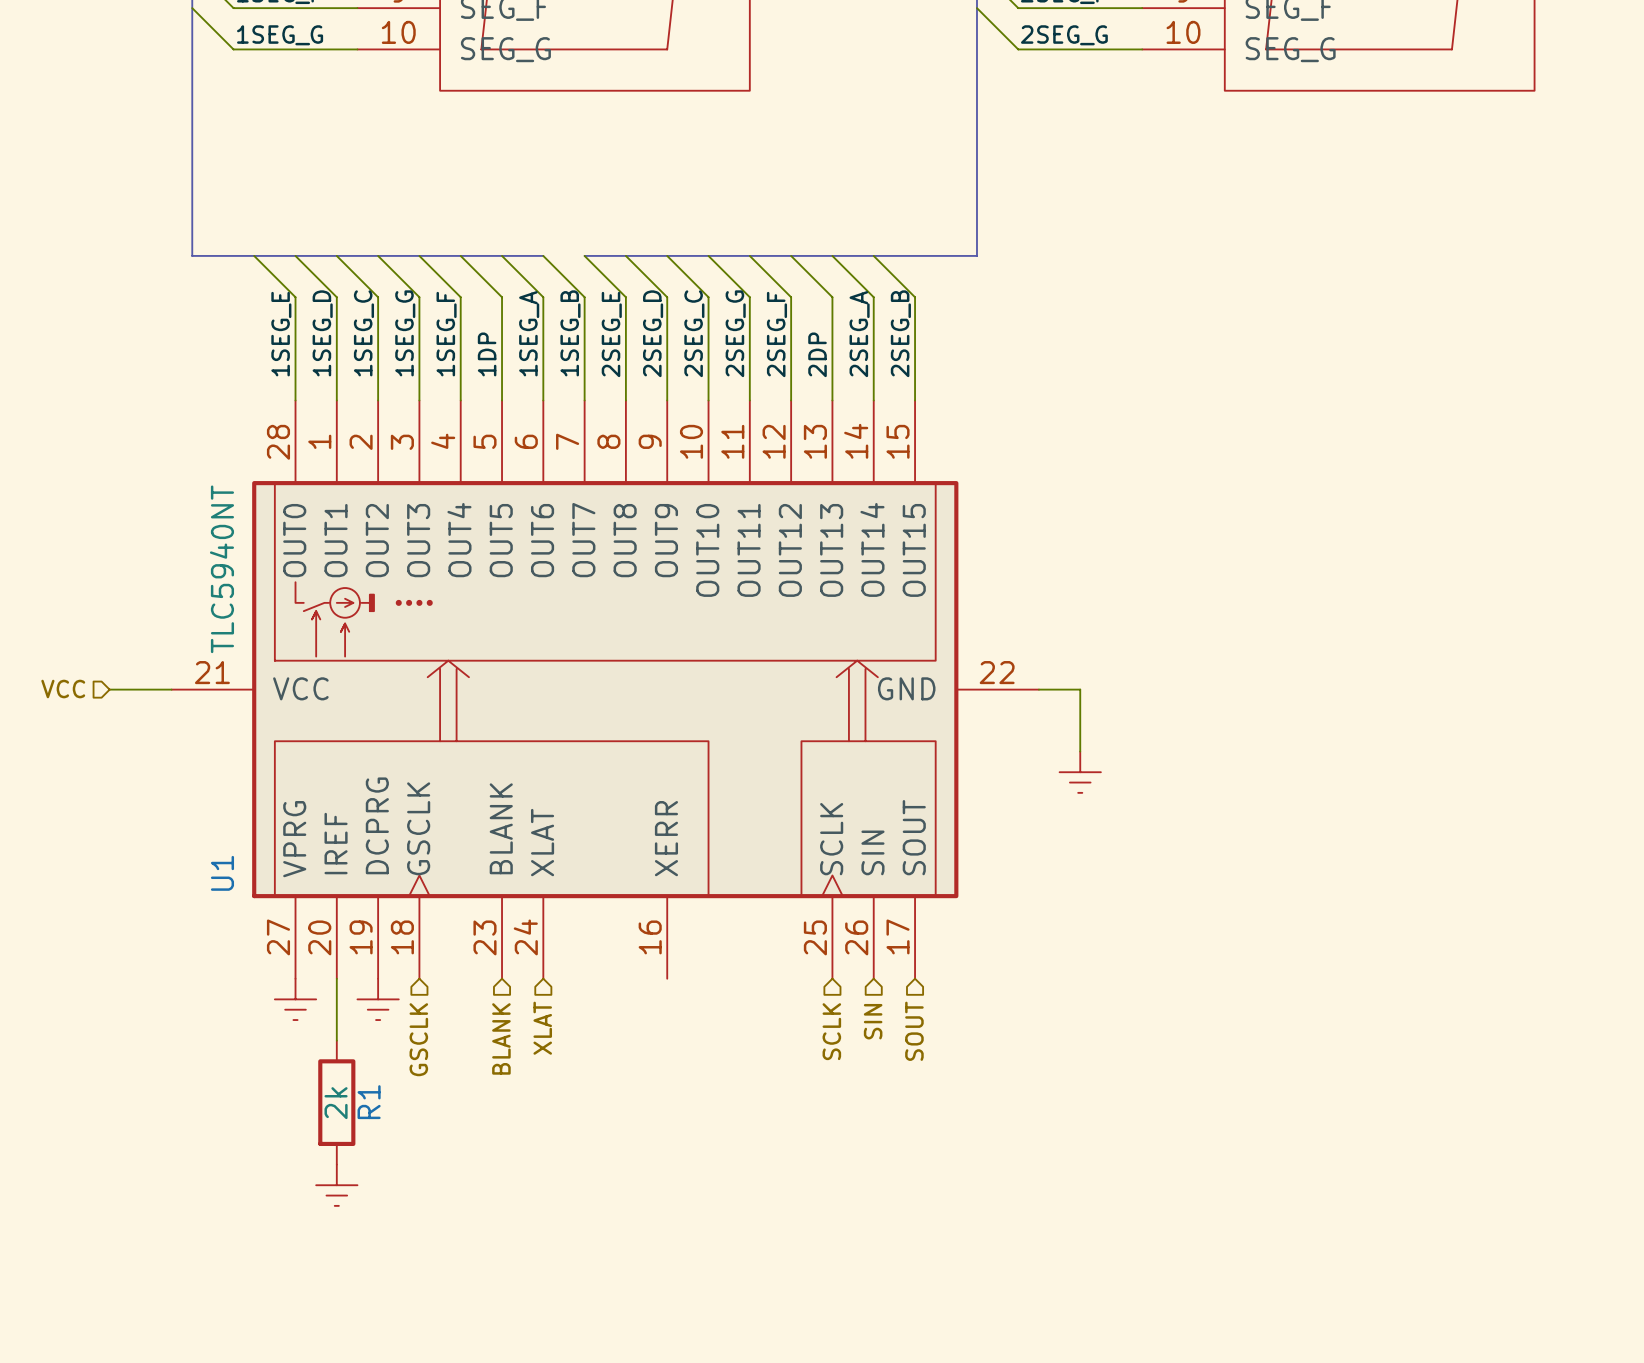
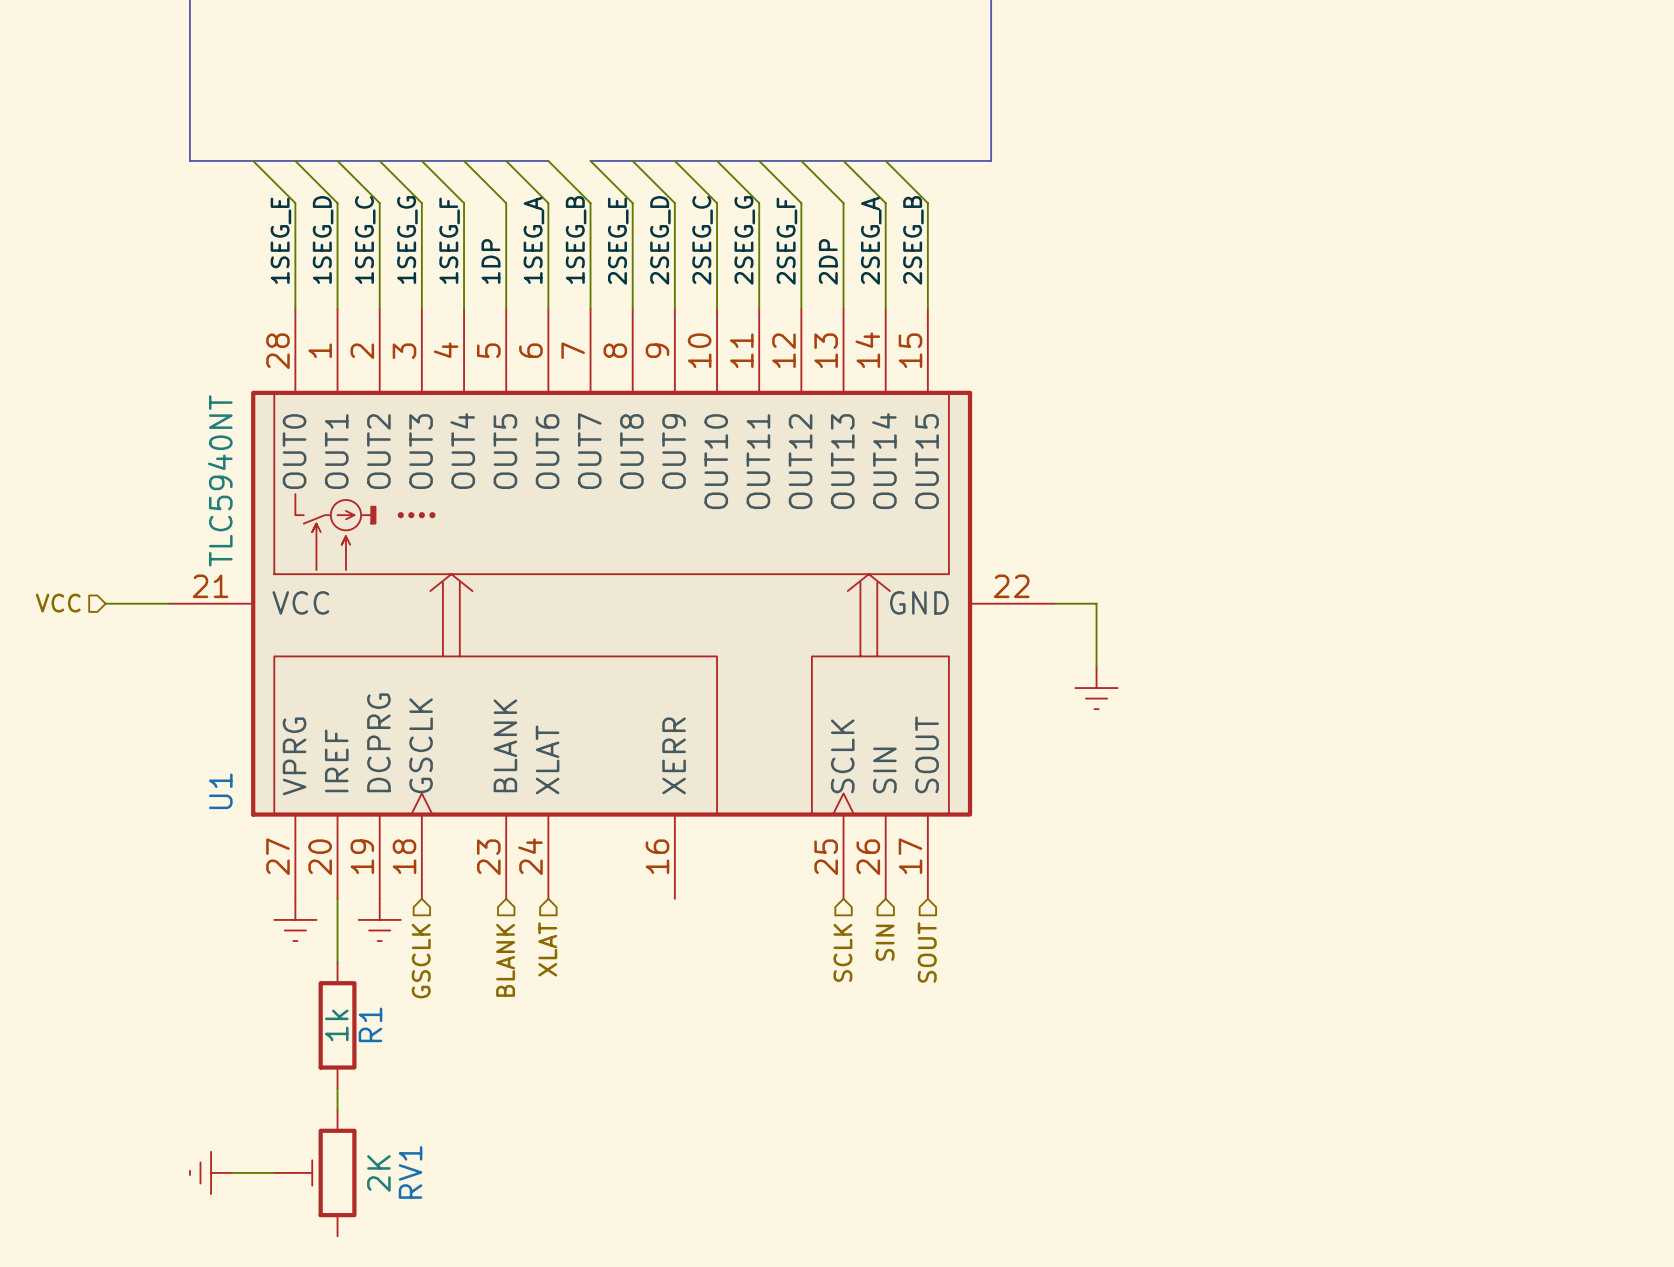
R1 value: 2k (336, 1103) -> 1k (336, 1025)
power symbol rotation: 0° (336, 1185) -> 90° clockwise (211, 1172)
power symbol position: (336, 1185) -> (211, 1172)
wire: none -> (232, 1172) (274, 1172)
RV1: none -> 2K (315, 1172)

